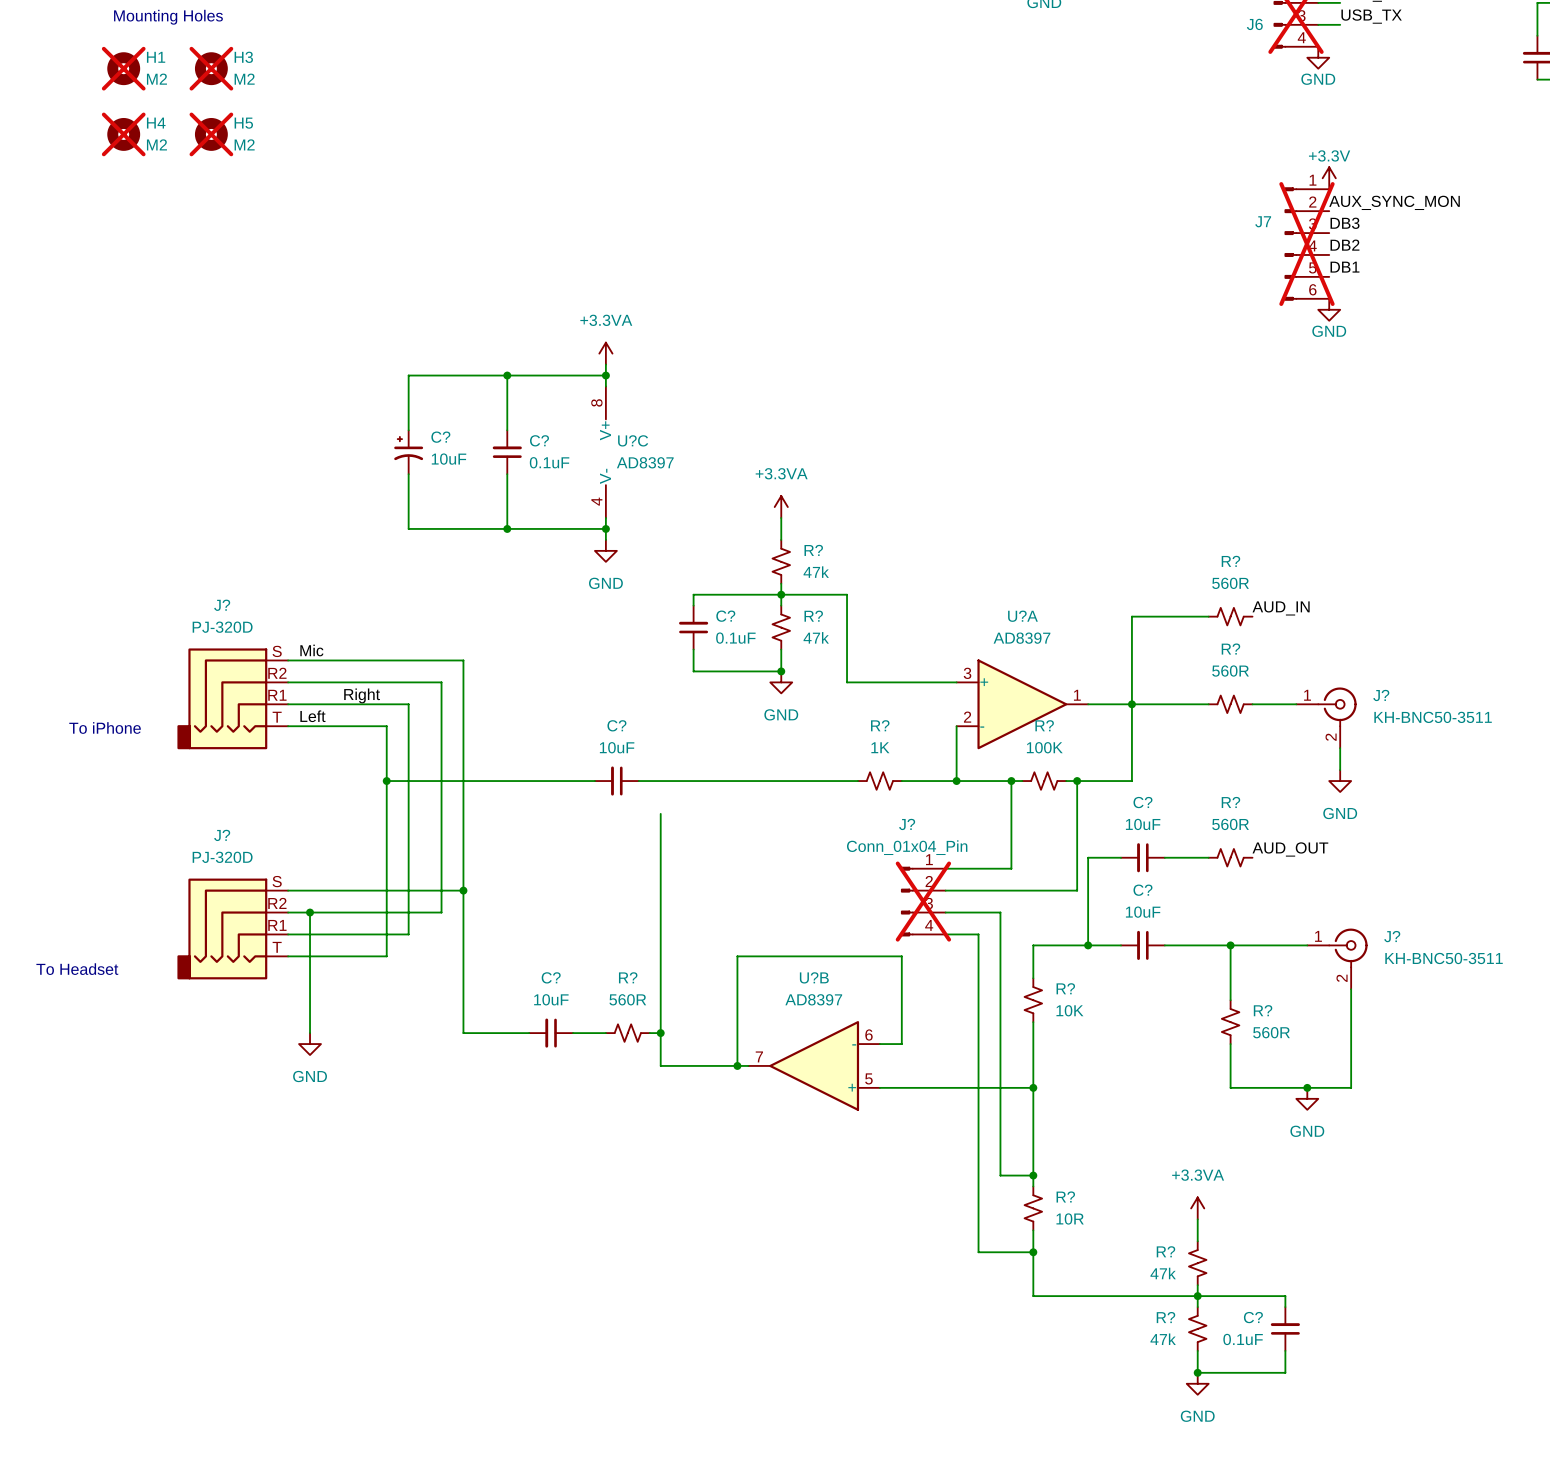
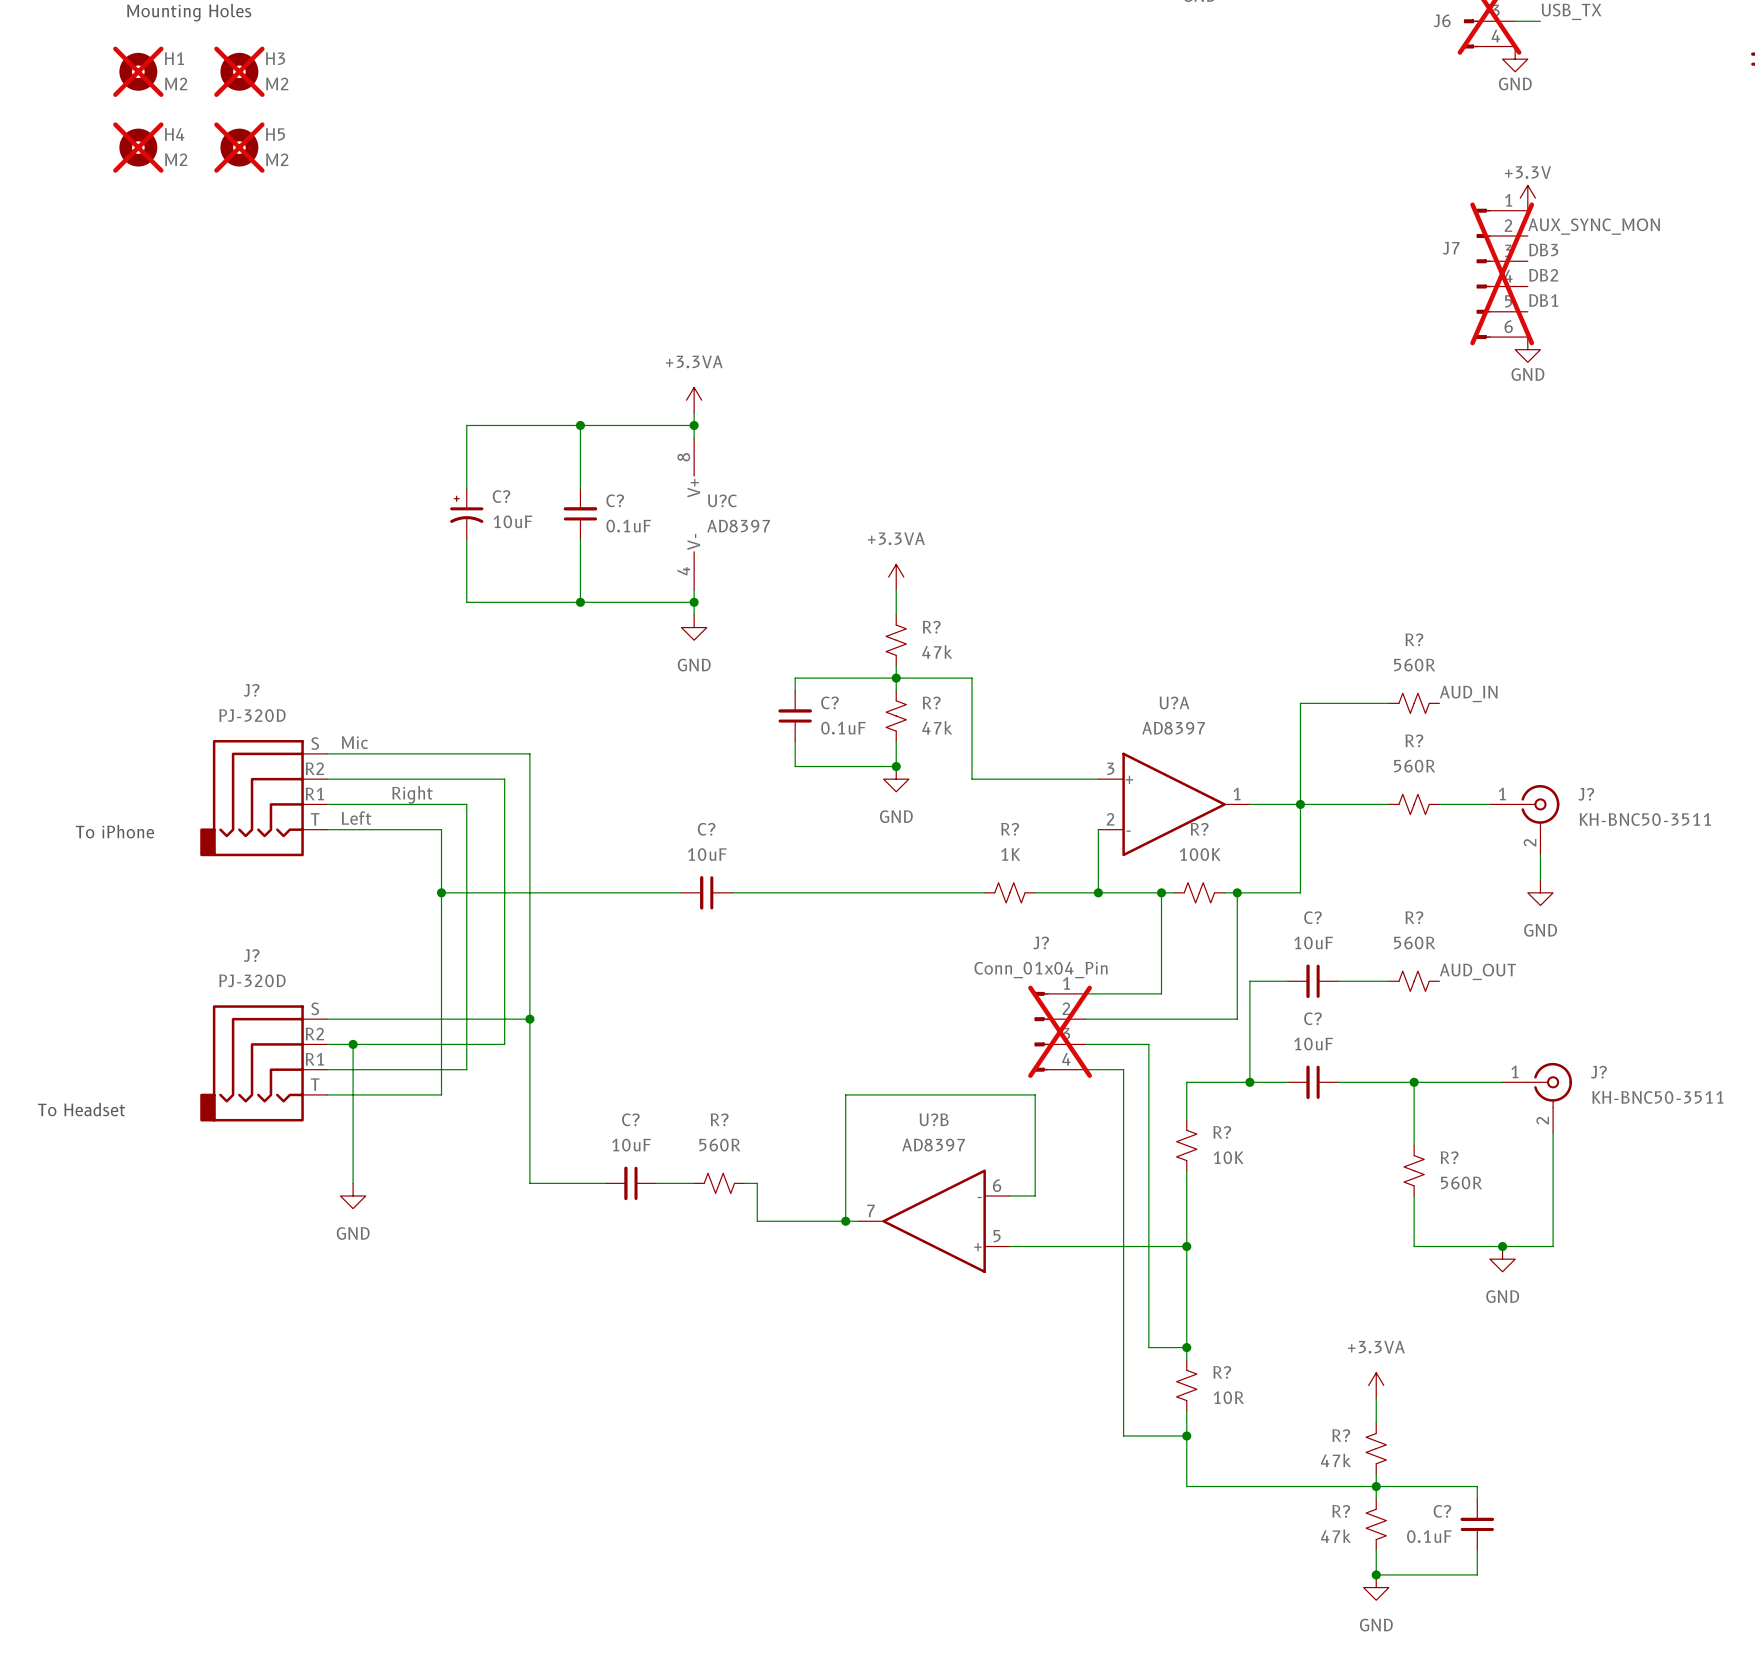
wire: (660, 813) (660, 1033) -> none
junction: (660, 1033) -> none

